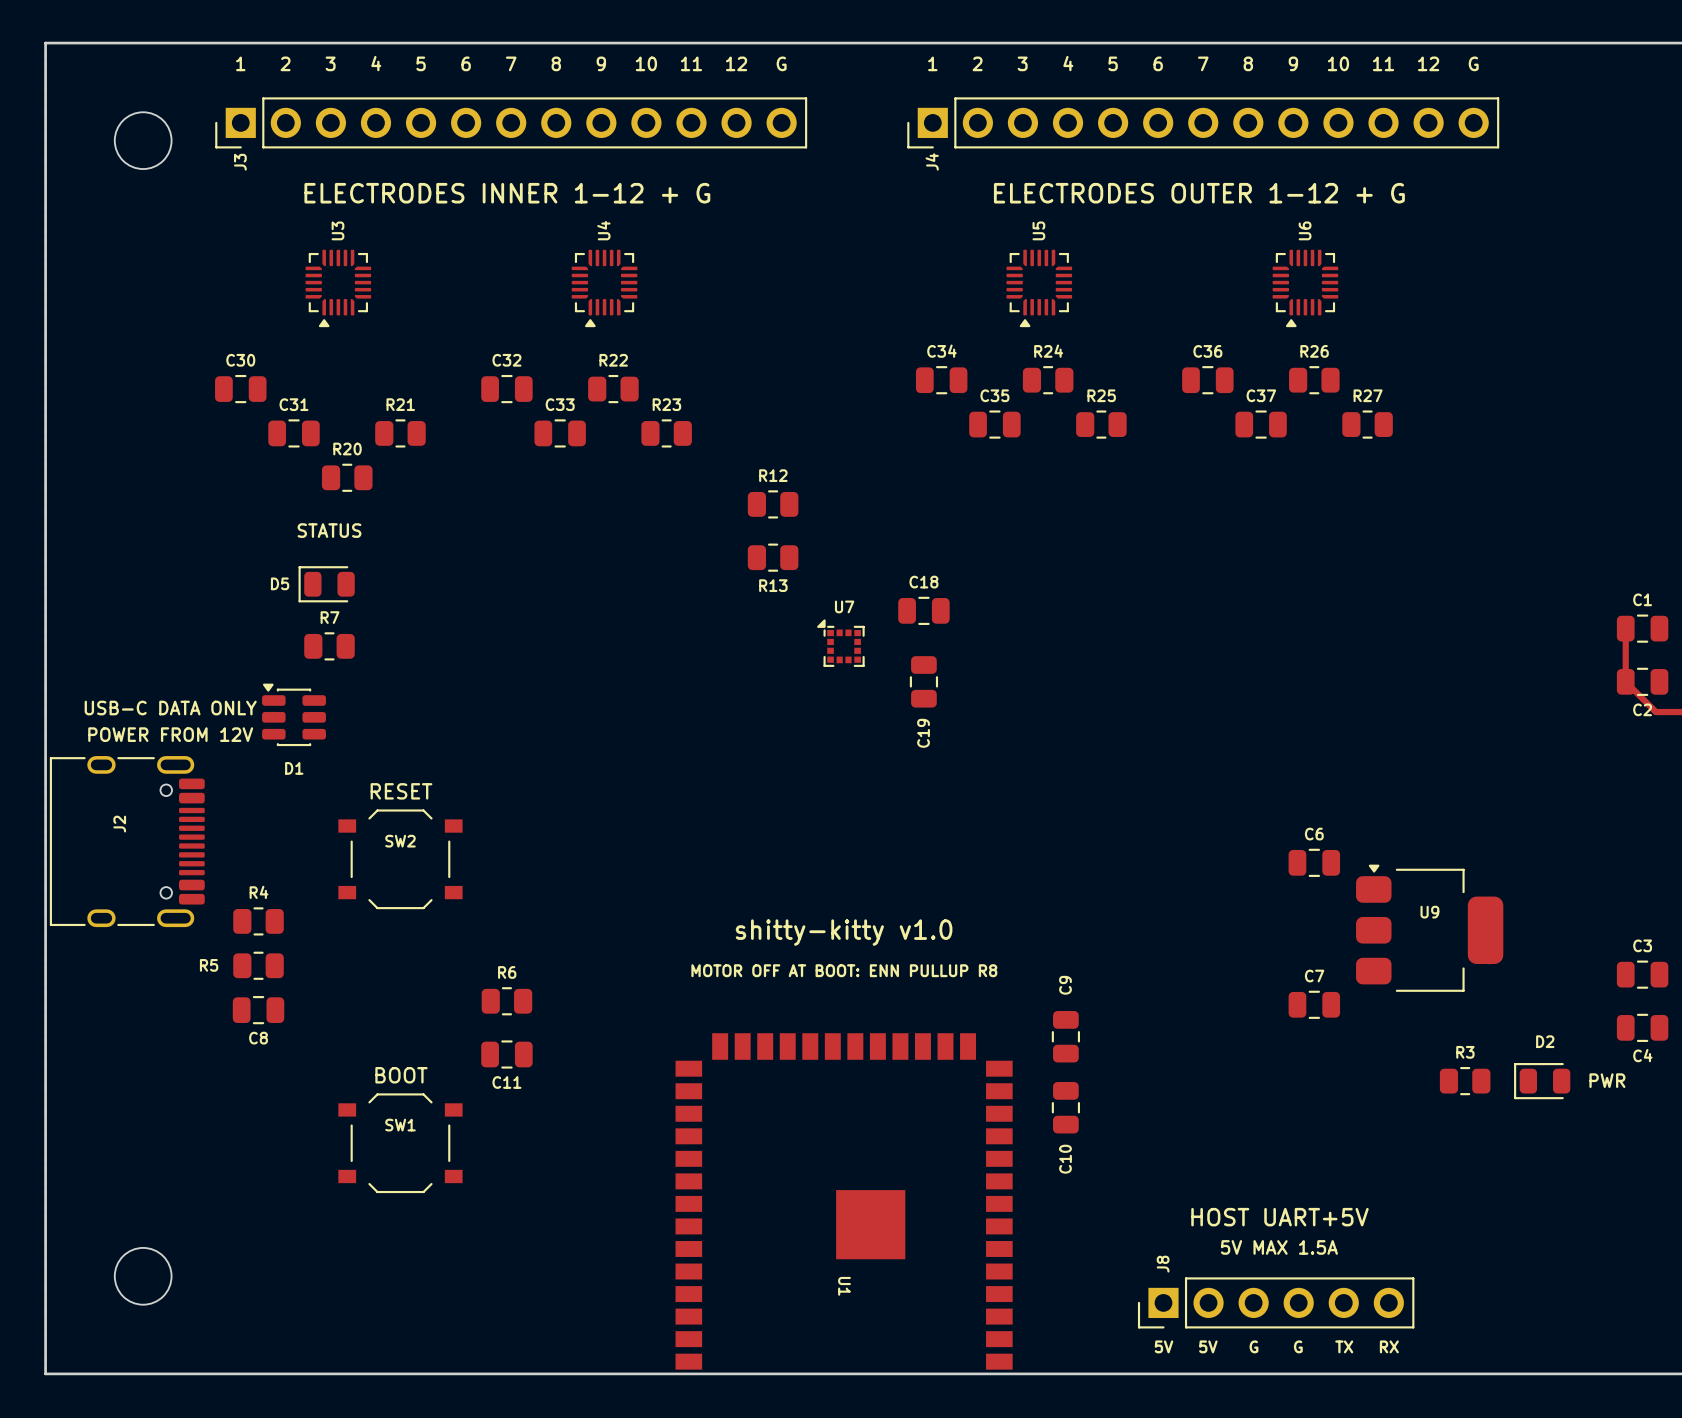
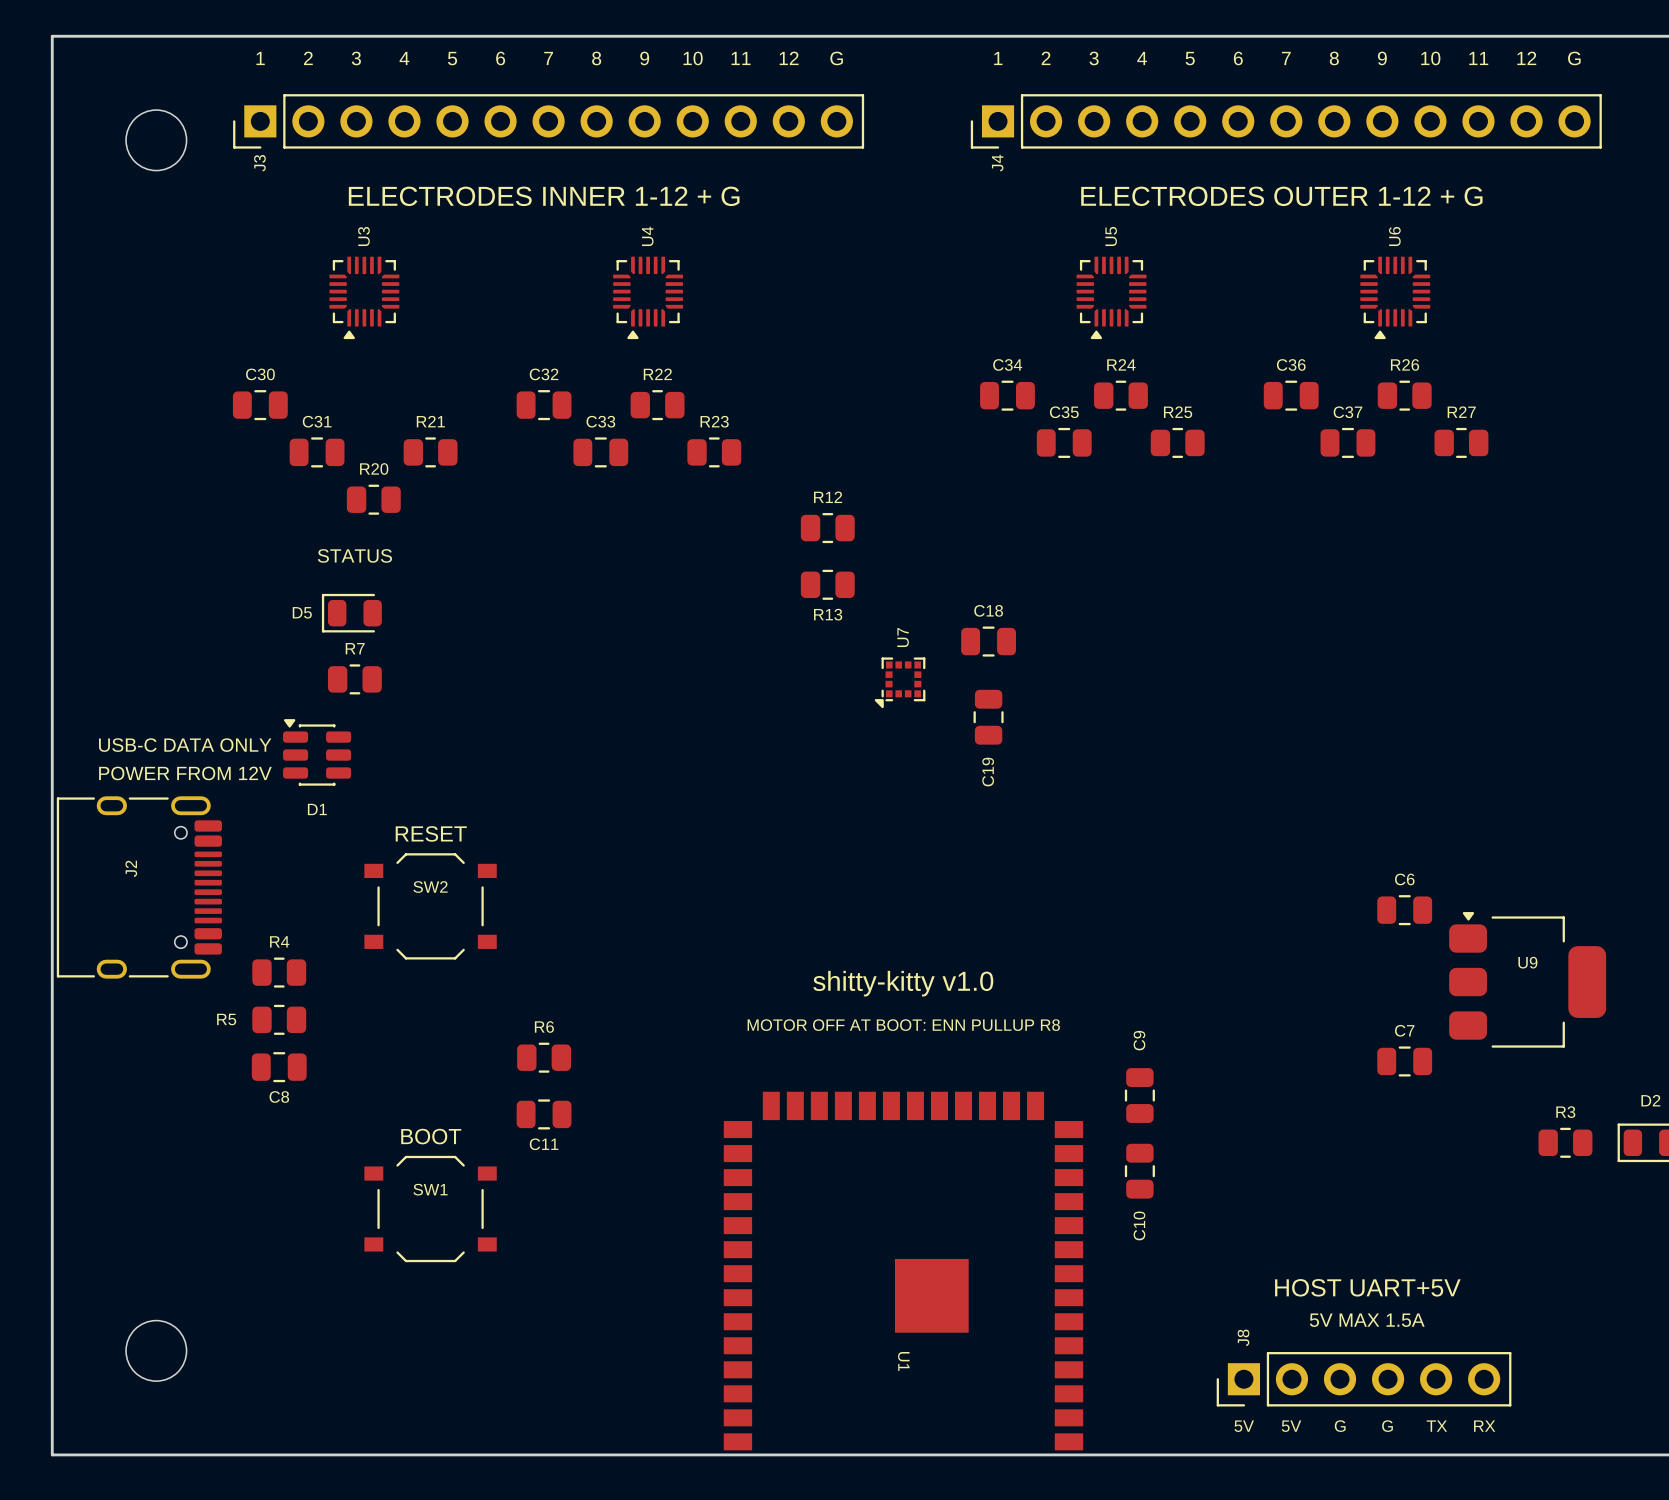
U7 rotation: 0° (840, 643) -> 90° counterclockwise (900, 682)

